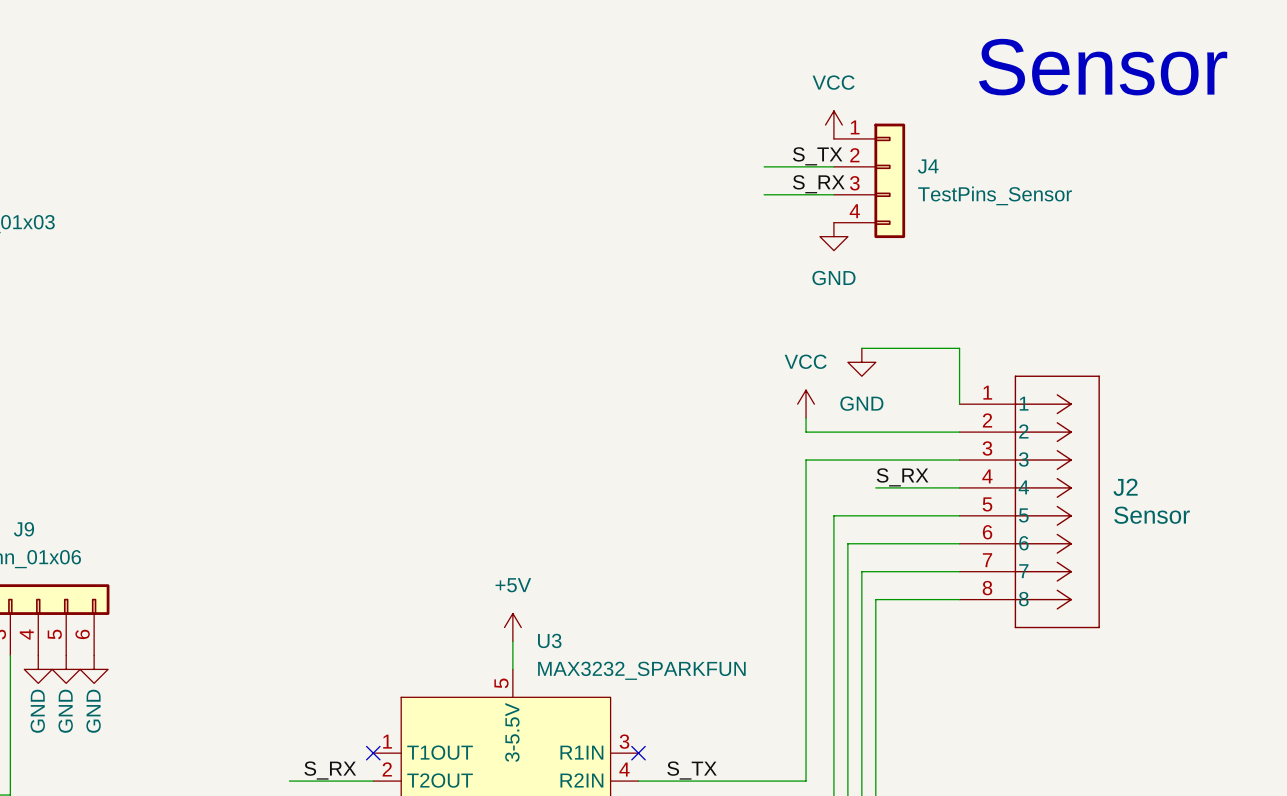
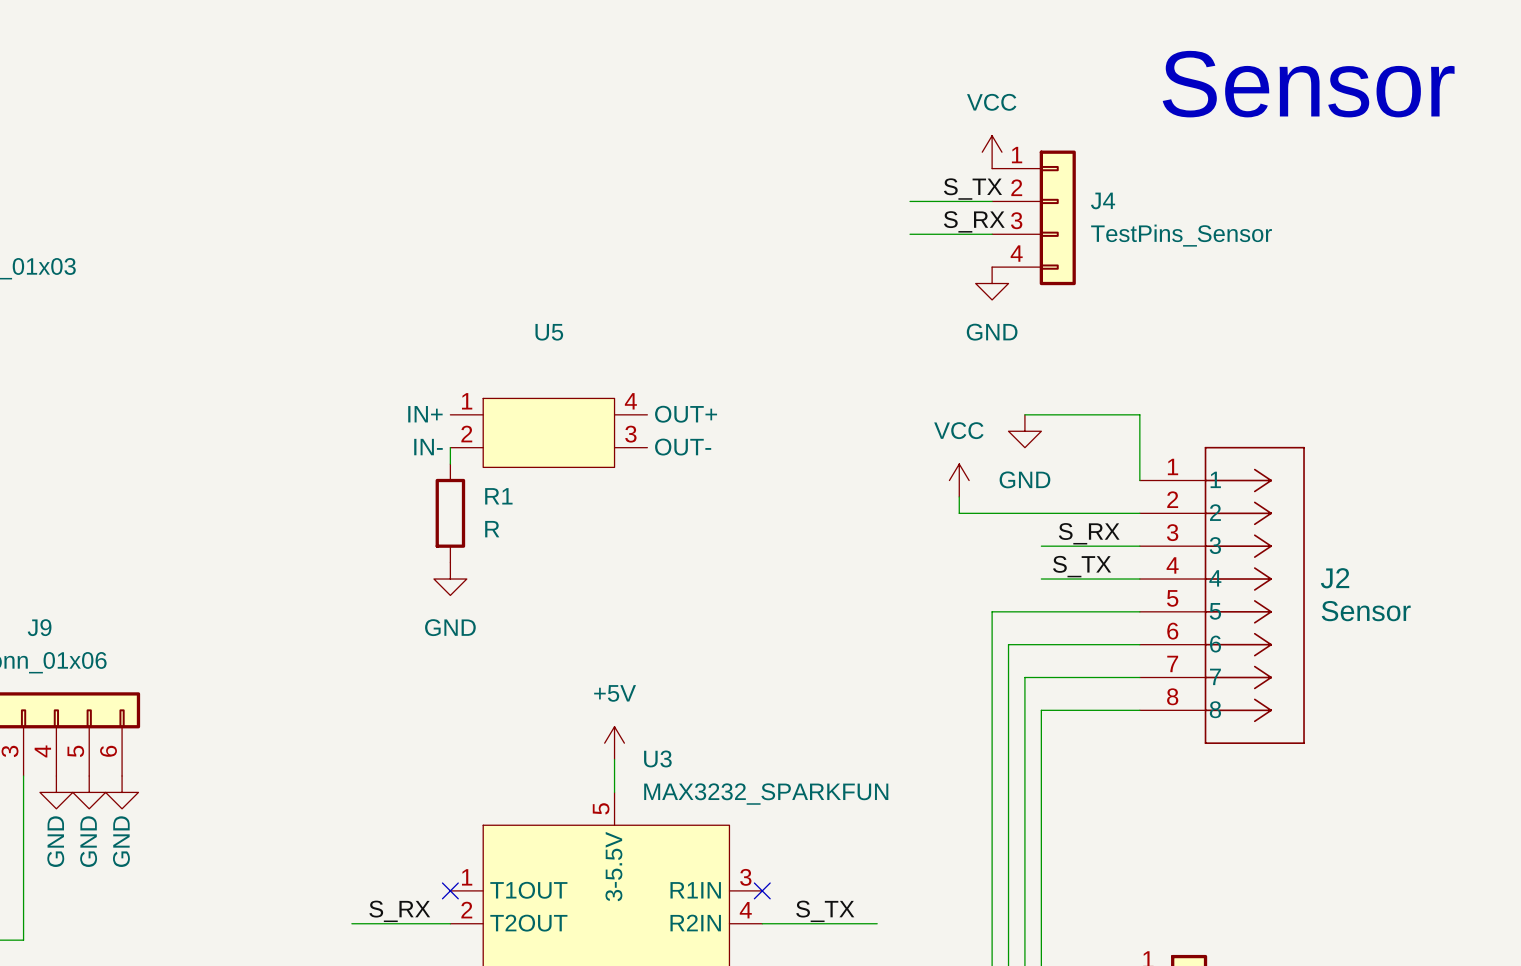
U5: none -> (548, 432)
wire: none -> (450, 447) (450, 464)
R1: none -> R (450, 513)
label: none -> S_RX (1089, 533)
wire: (875, 460) (806, 460) (806, 781) (736, 781) -> none
label: S_RX (902, 477) -> S_TX (1082, 566)
power symbol: none -> GND (450, 579)

